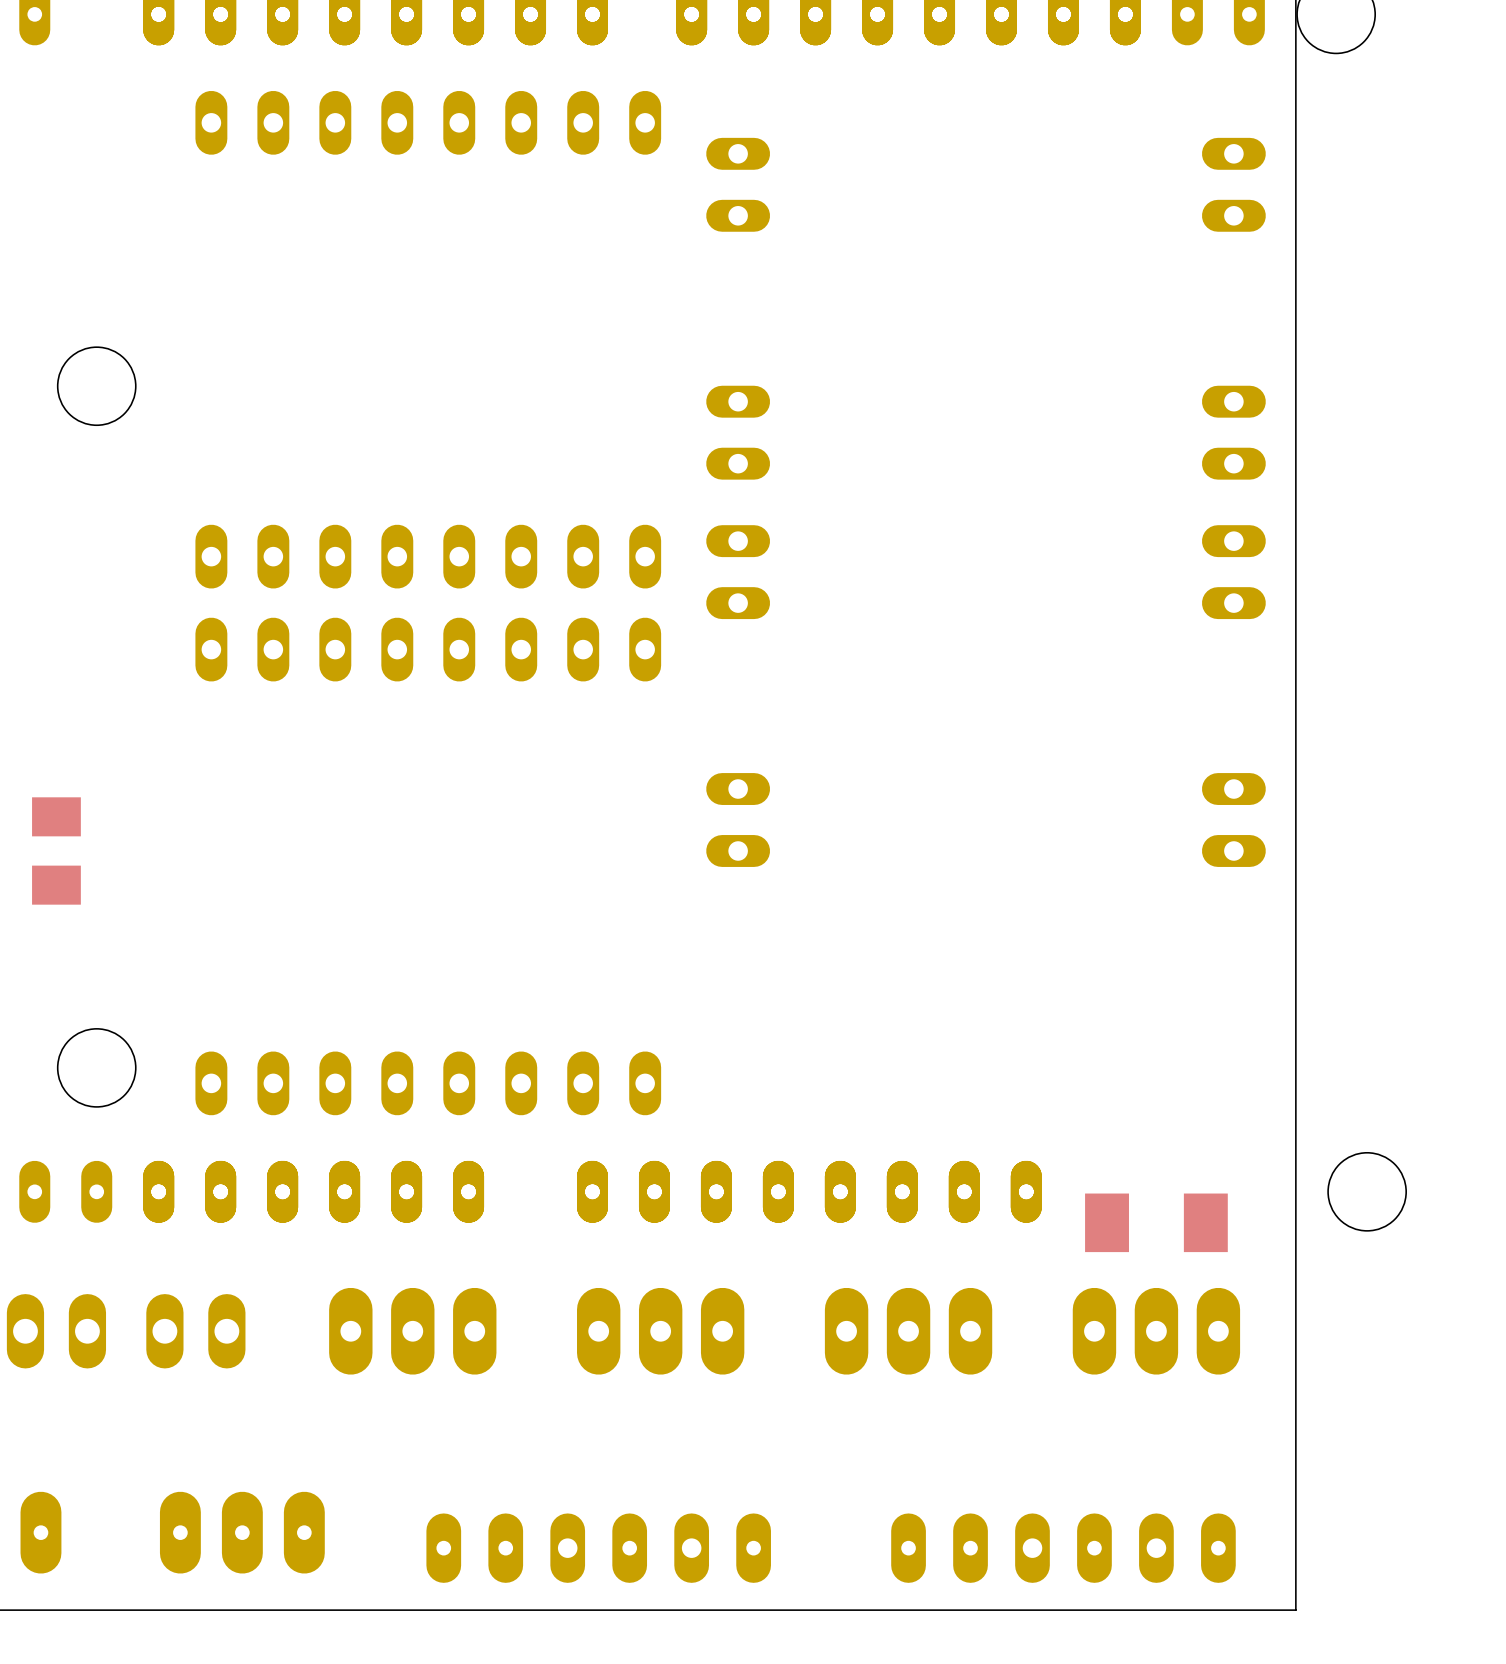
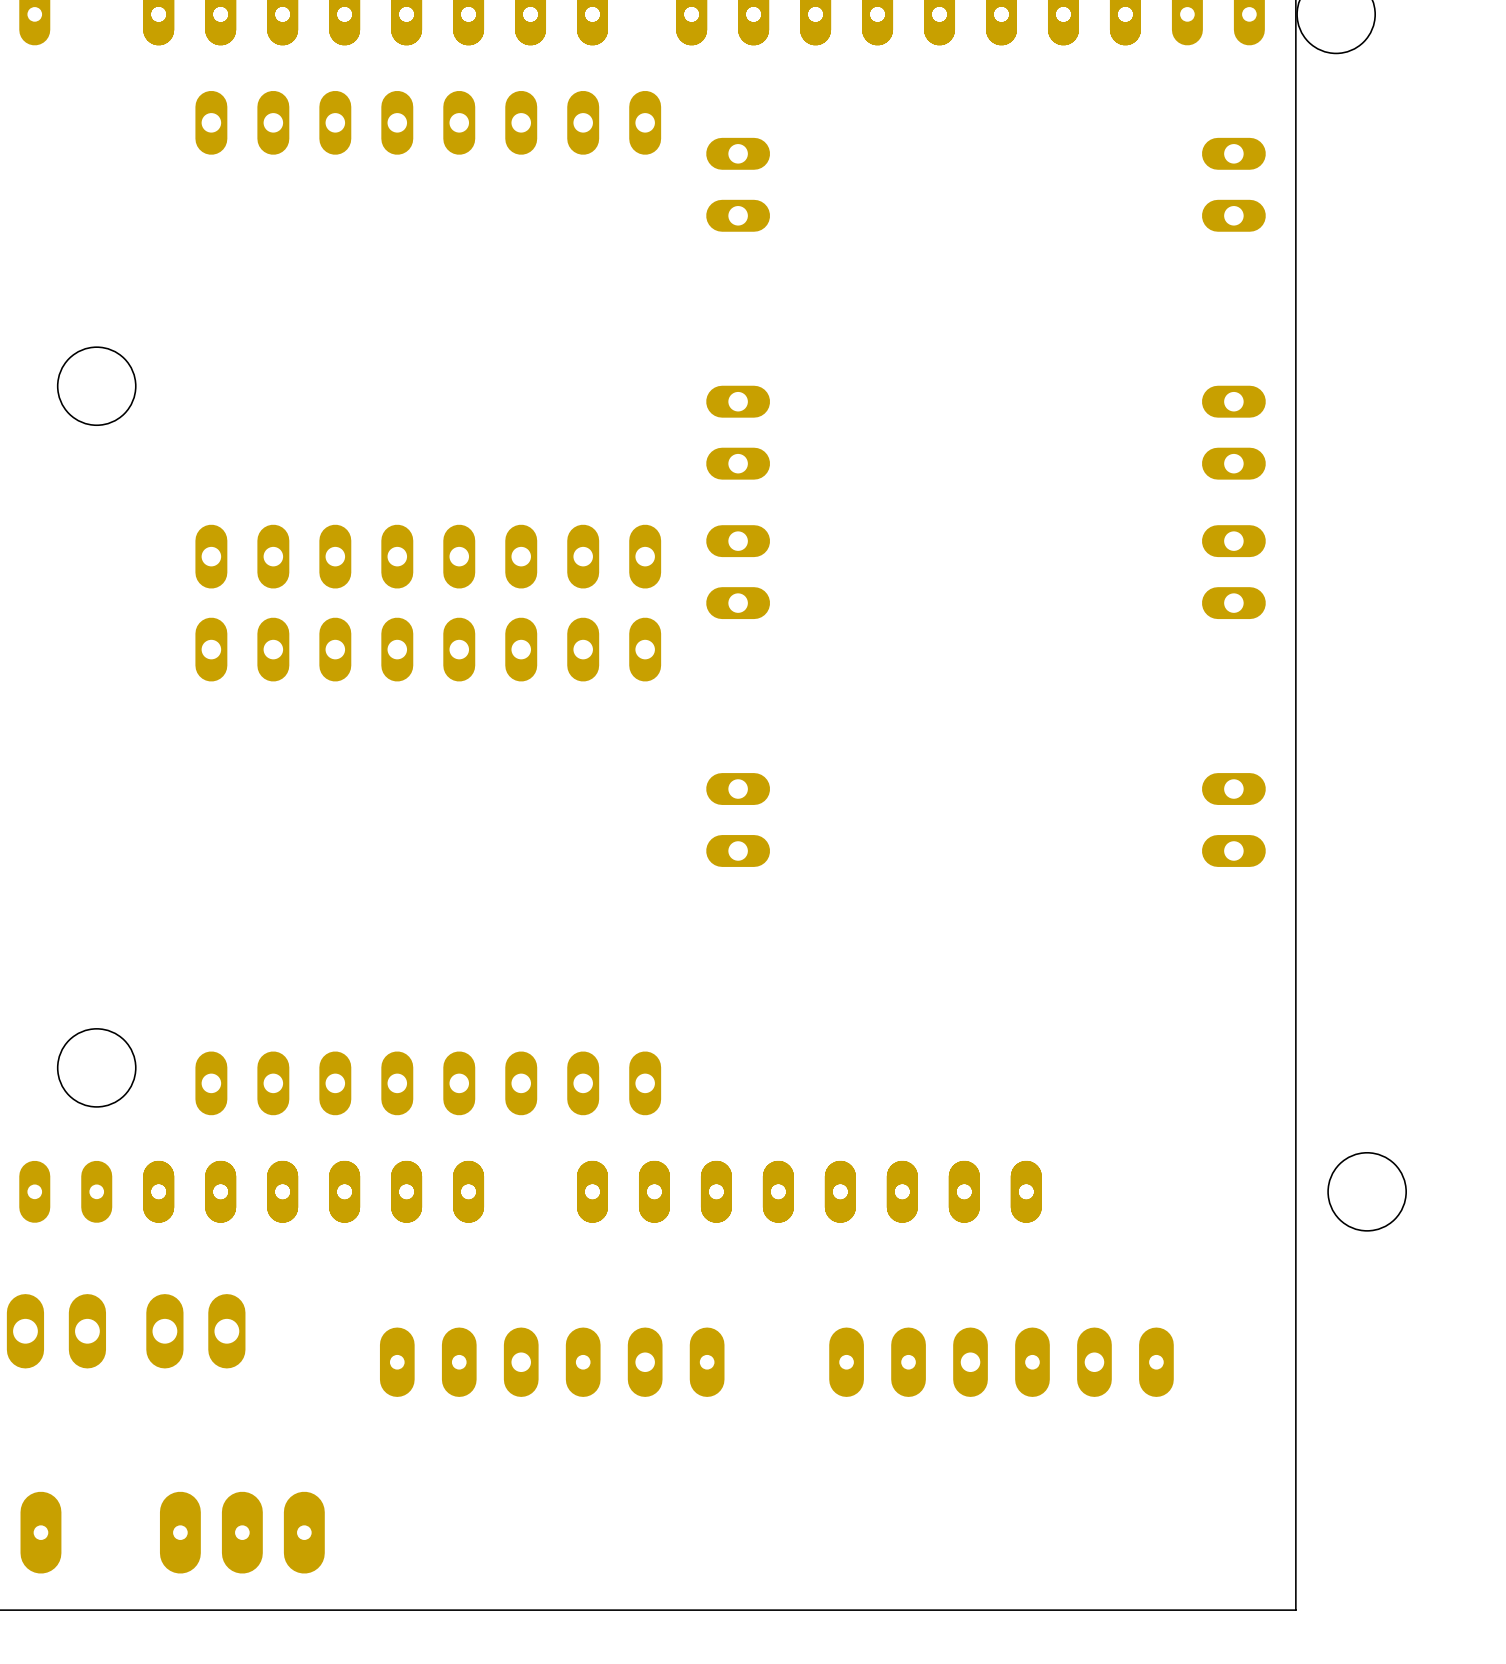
part: (56, 850) -> none
part: (1156, 1222) -> none
part: (412, 1331) -> none
part: (660, 1331) -> none
part: (908, 1331) -> none
part: (1156, 1331) -> none
part position: (598, 1548) -> (552, 1362)
part position: (1063, 1548) -> (1001, 1362)

